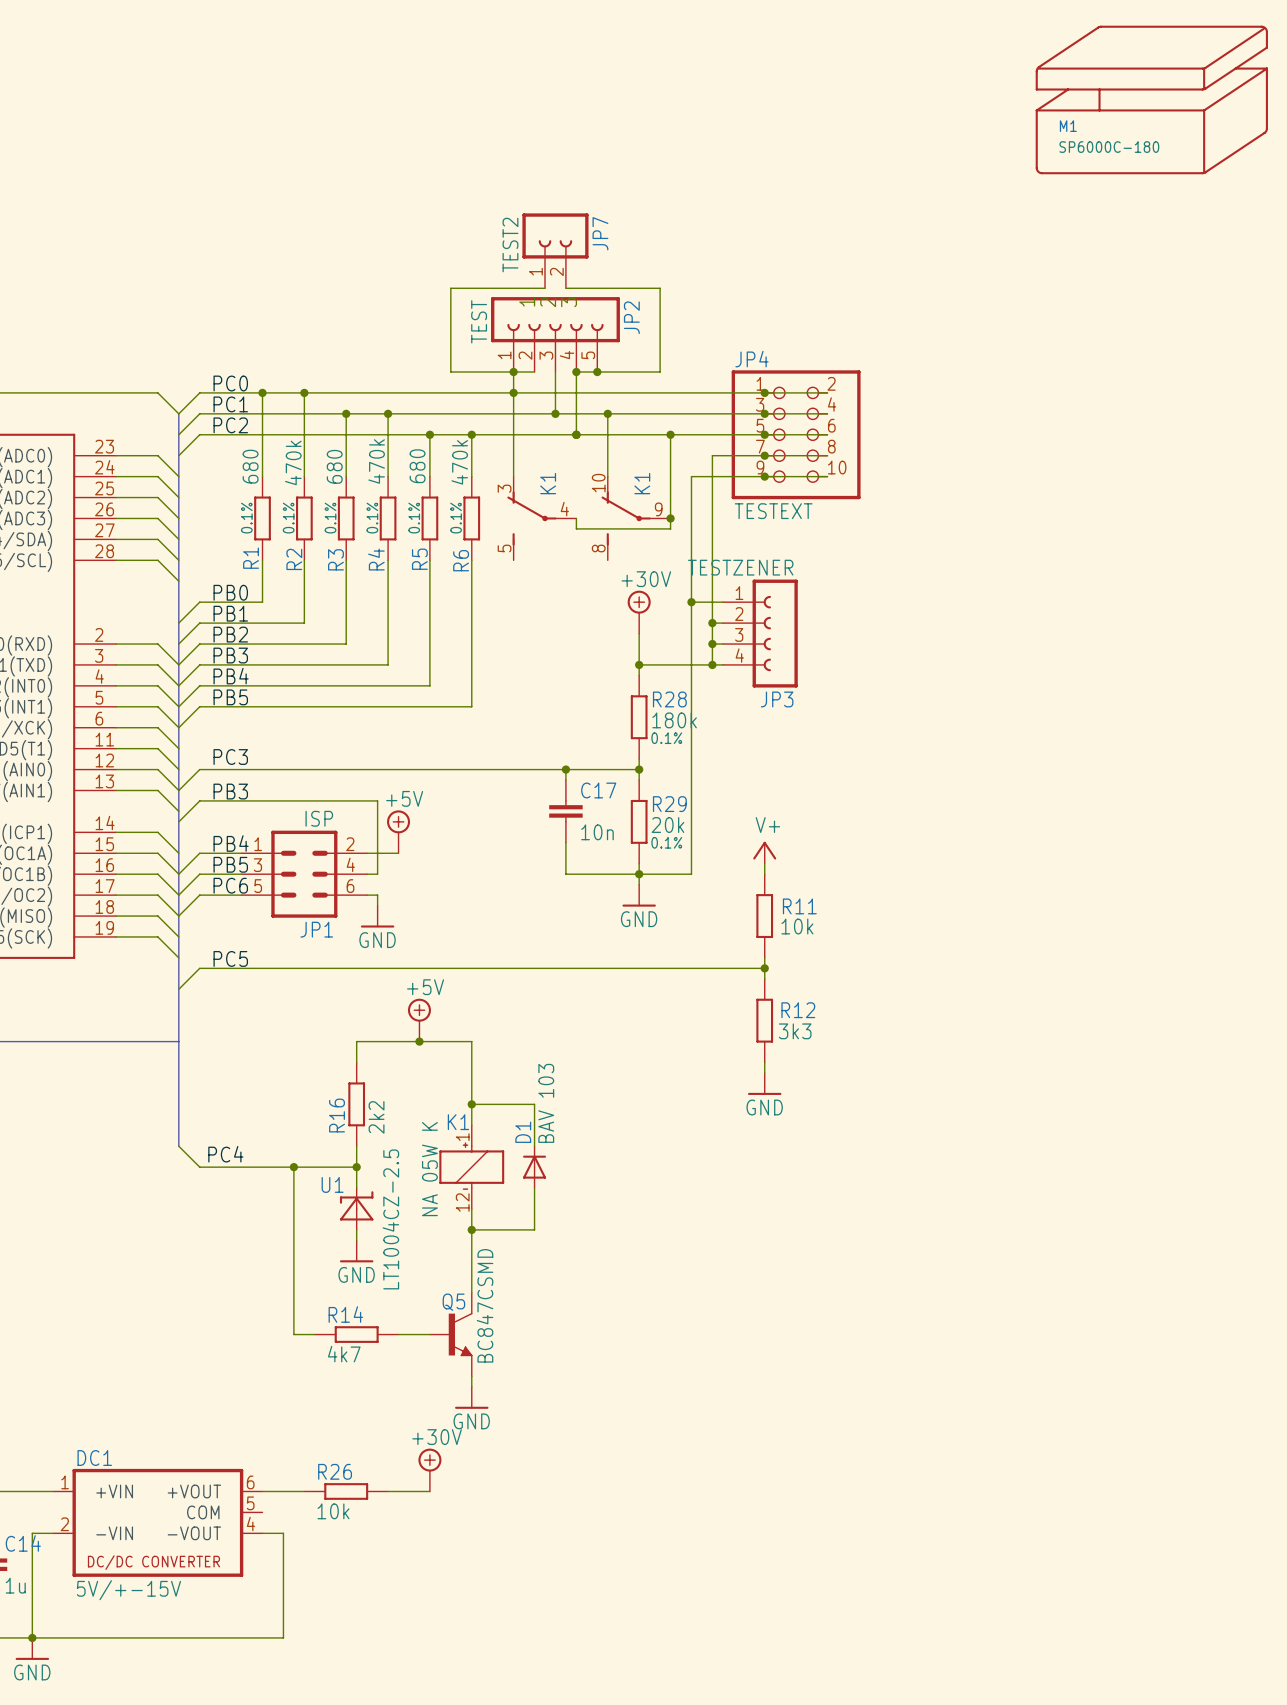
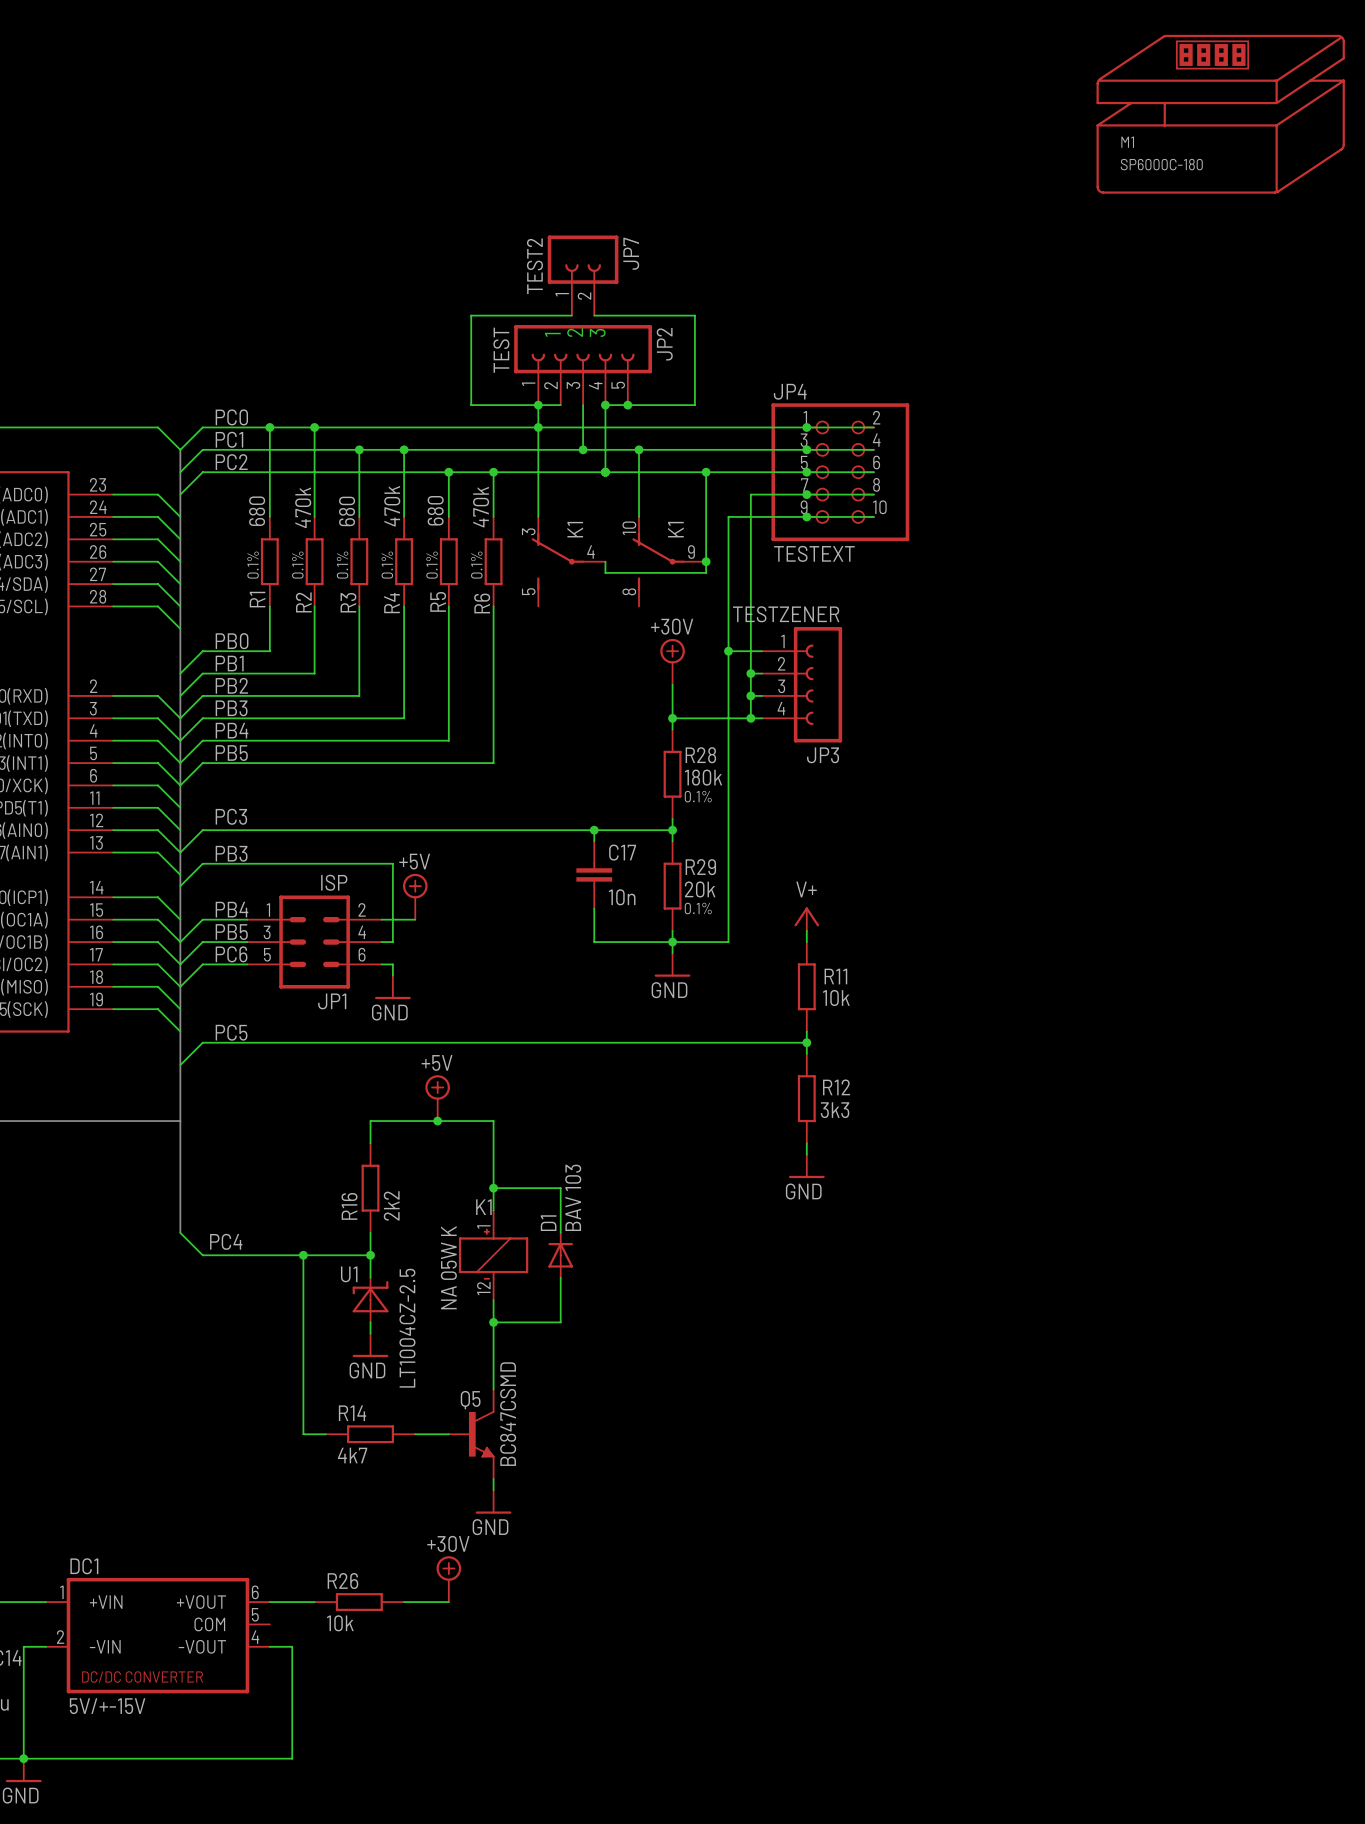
part: none -> (1212, 54)

